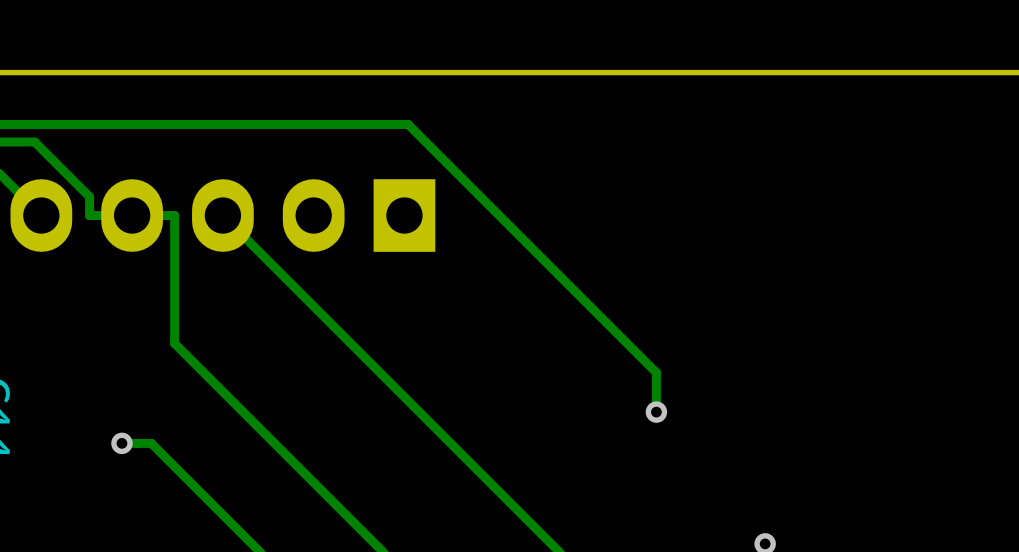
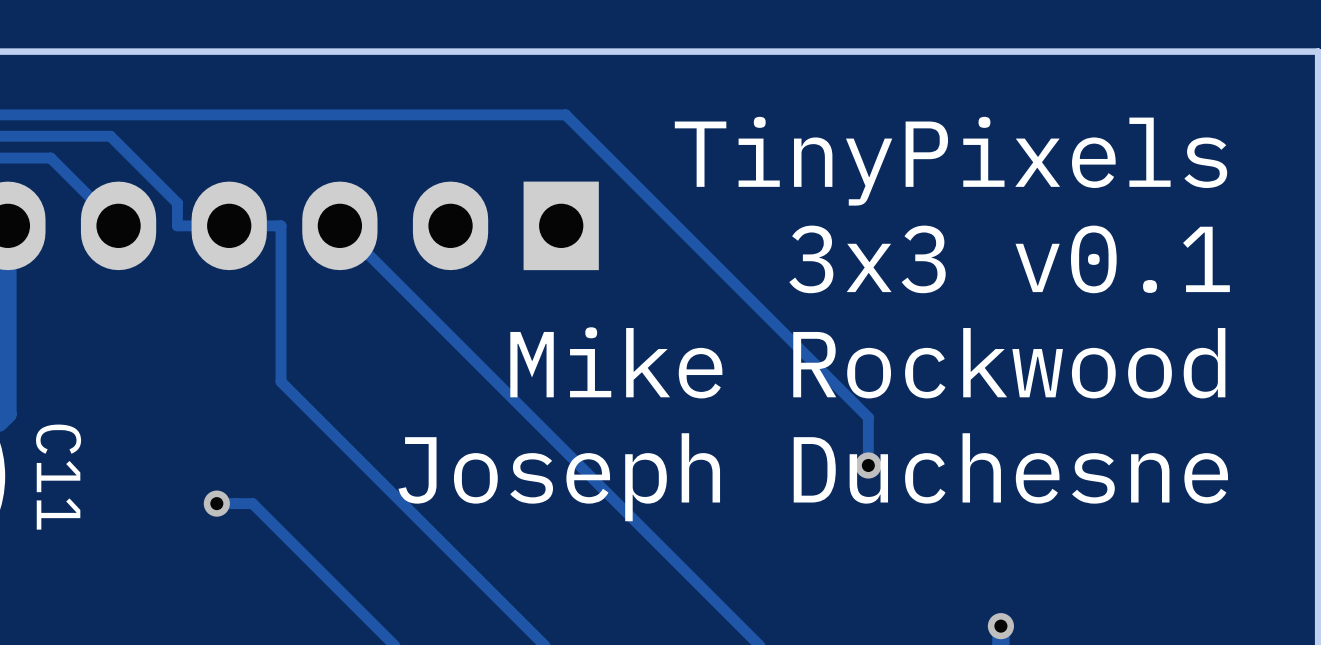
text: none -> TinyPixels (950, 161)
text: none -> 3x3 v0.1 (1009, 259)
text: none -> Mike Rockwood (867, 362)
text: none -> Joseph Duchesne (813, 477)

